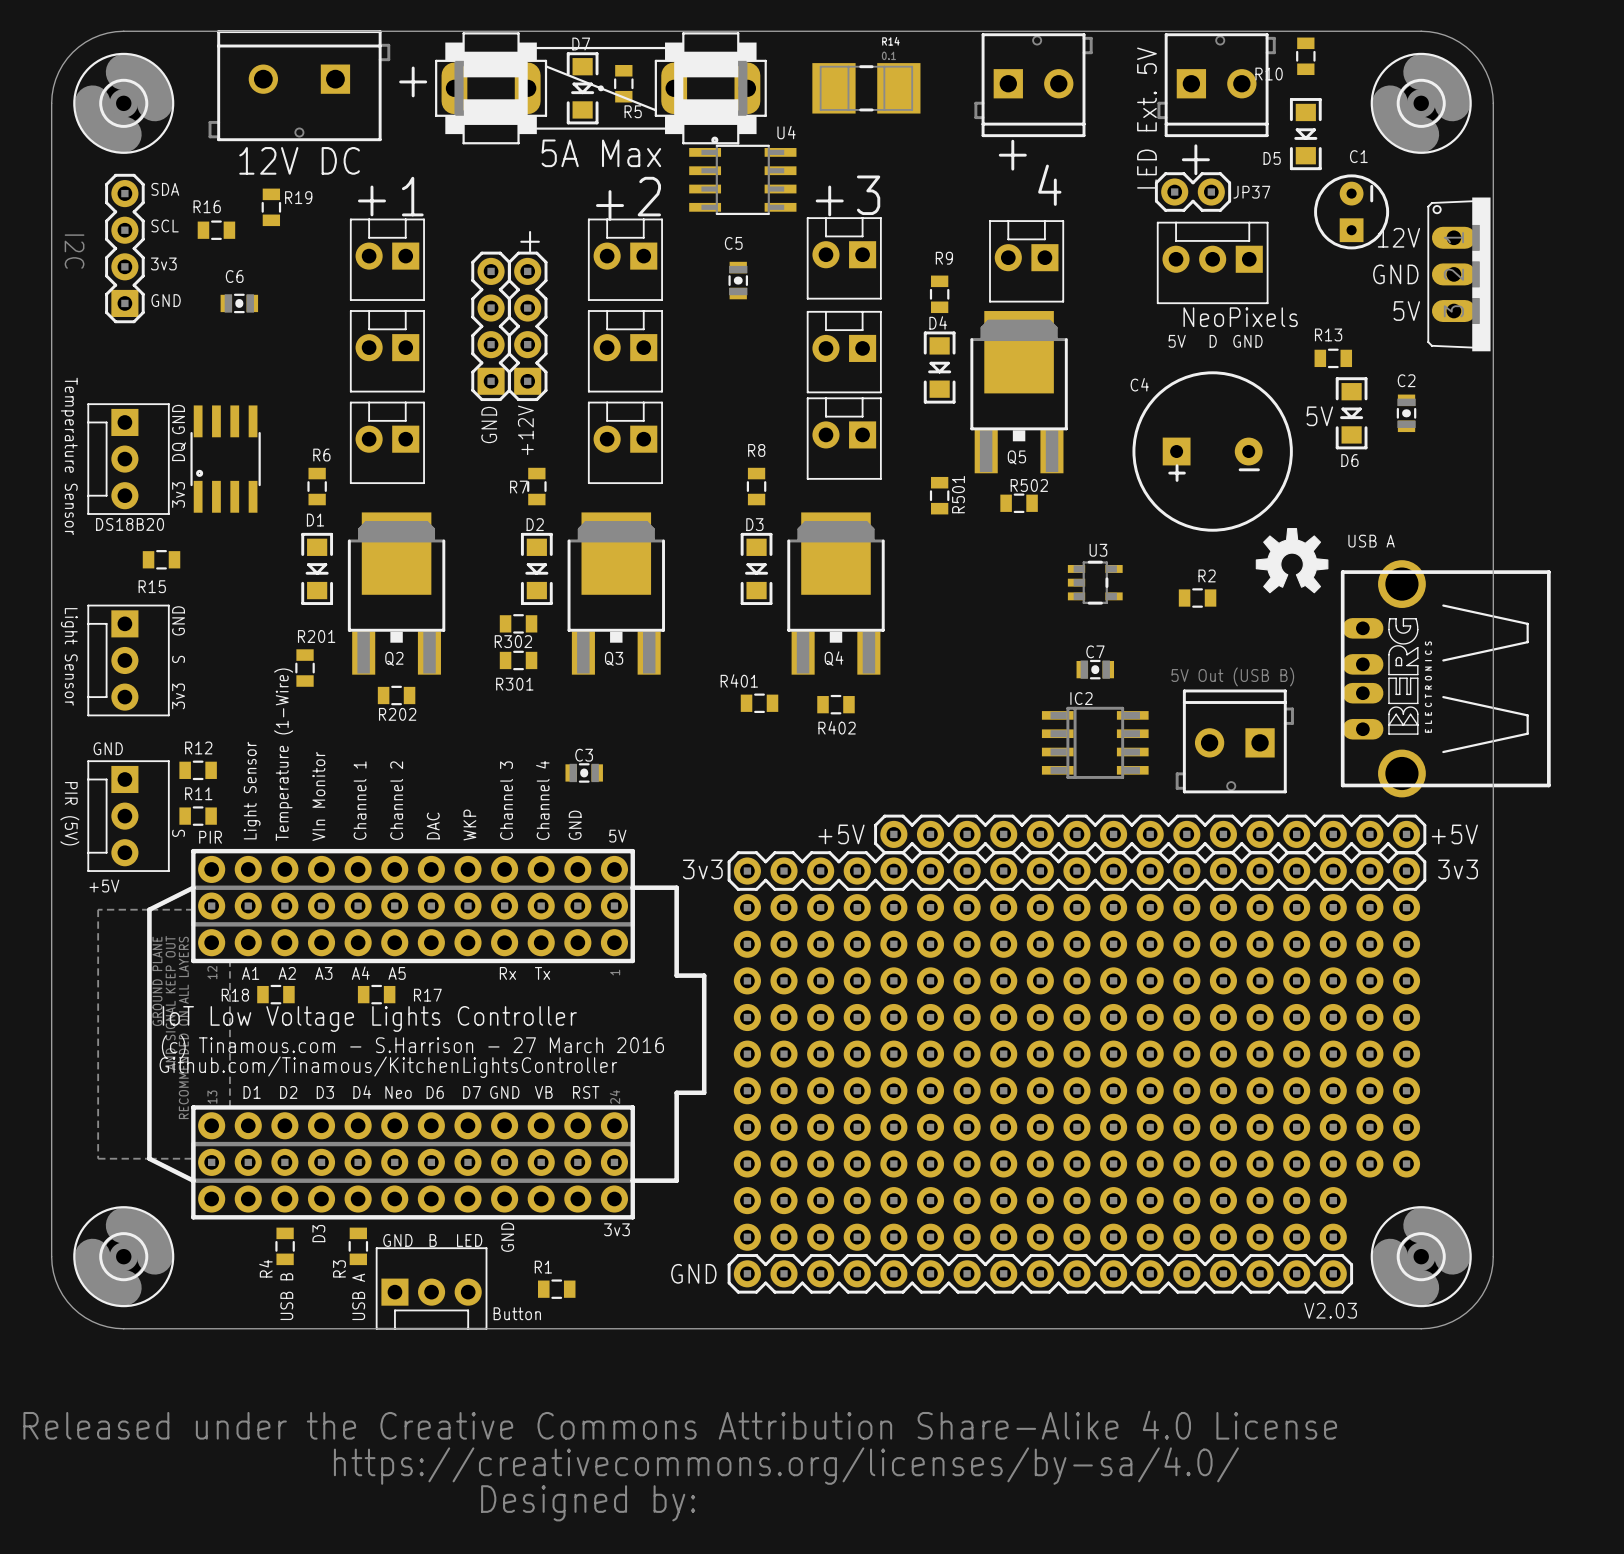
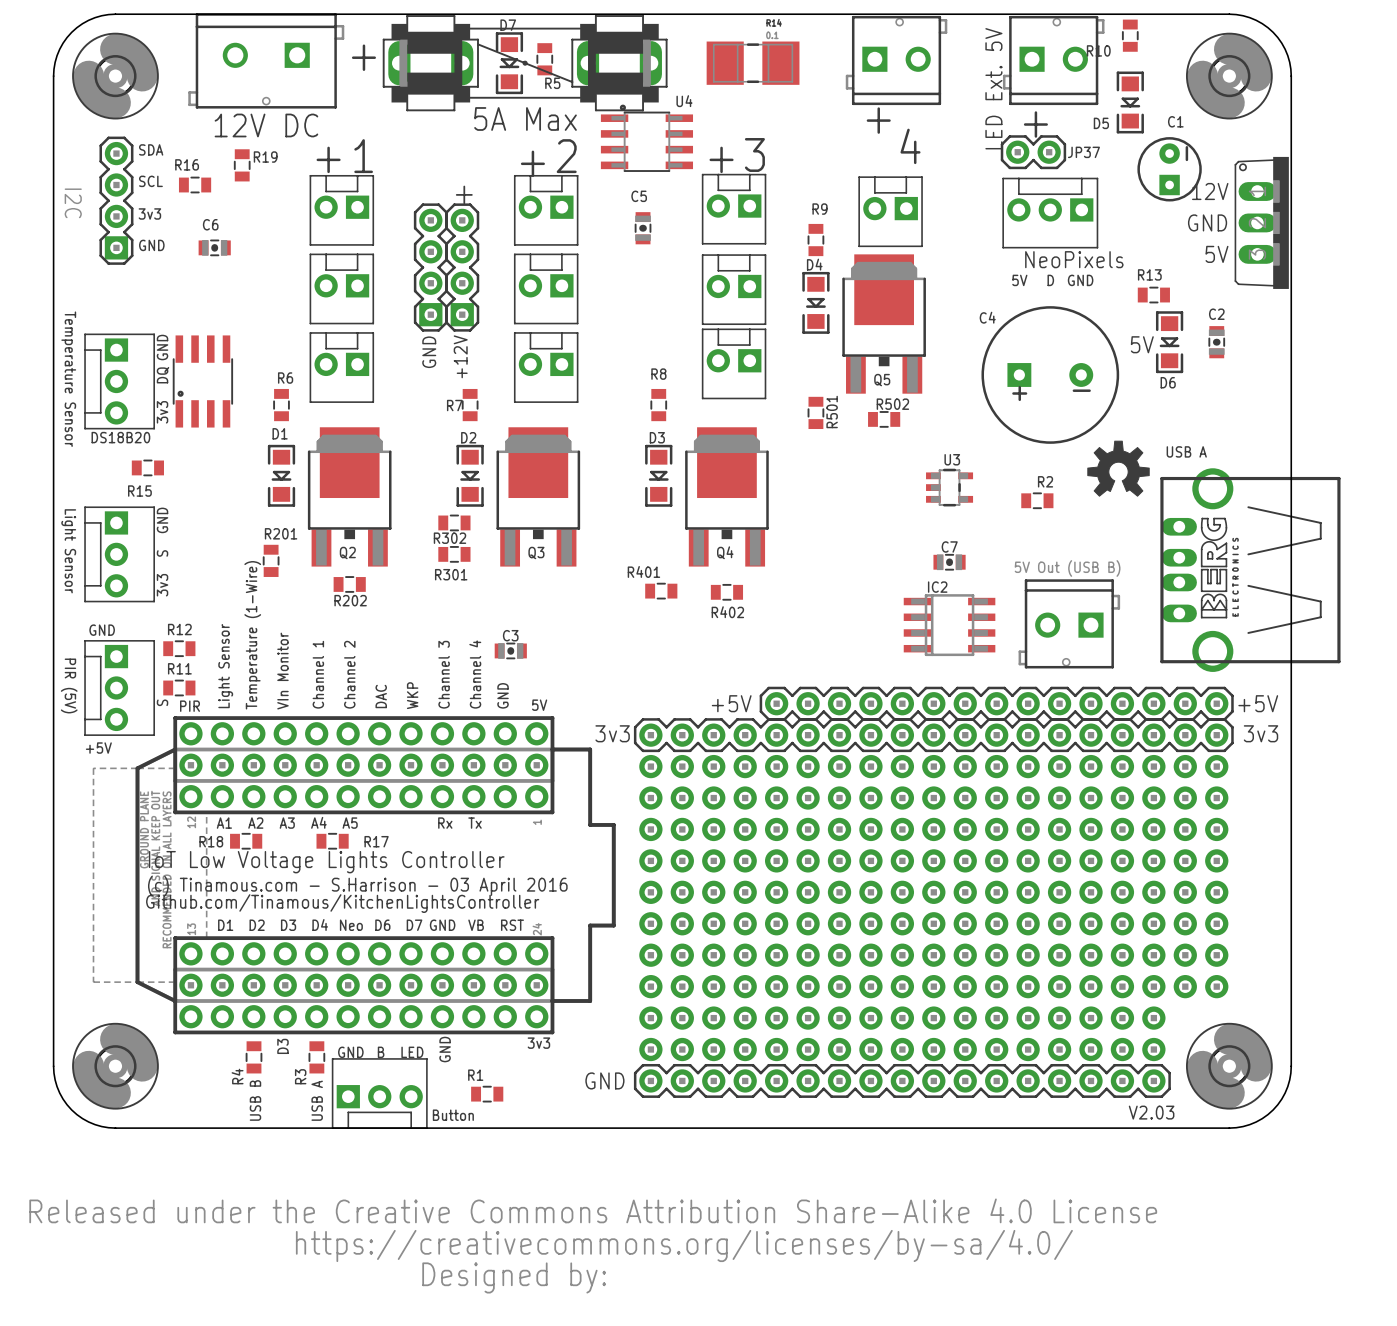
text: (c) Tinamous.com - S.Harrison - 27 March 2016 (412, 1046) -> (c) Tinamous.com - S.Harrison - 03 April 2016 (357, 886)

